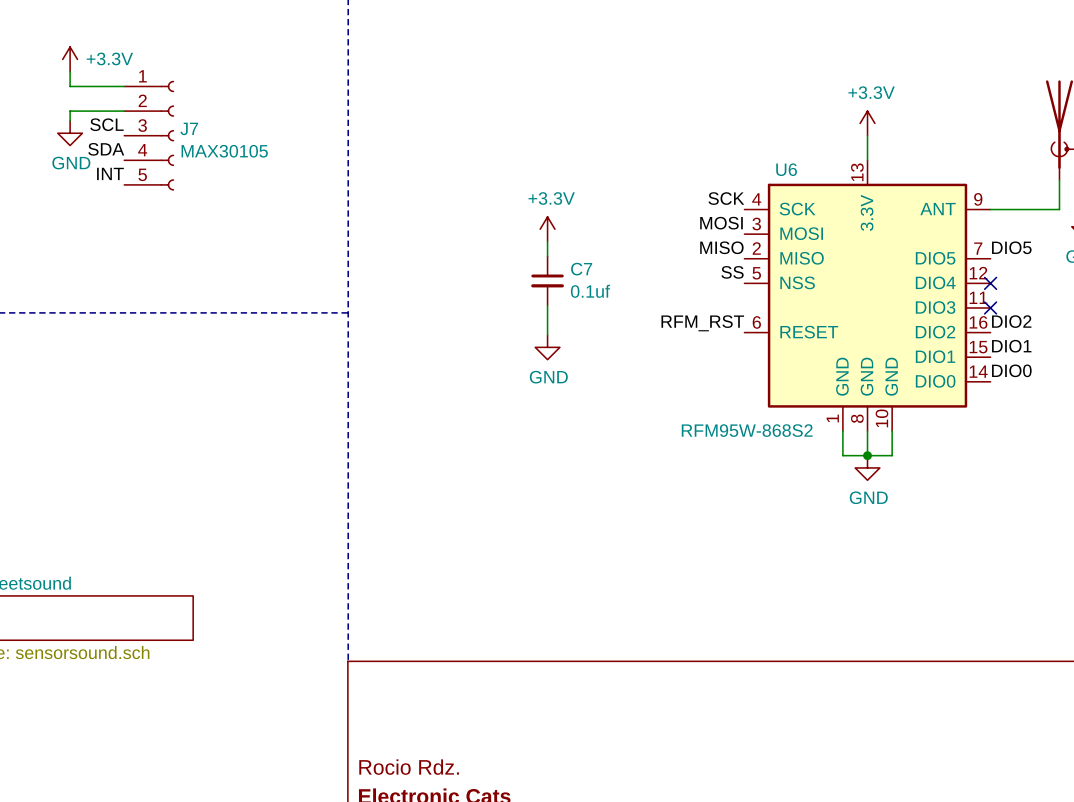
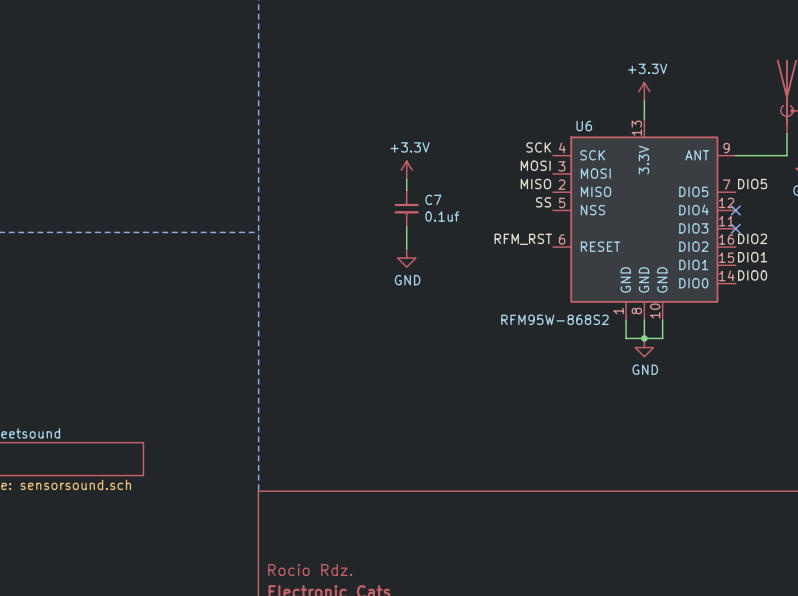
power symbol: +3.3V (70, 59) -> none
wire: (70, 71) (70, 86) (124, 86) -> none
wire: (124, 111) (70, 111) (70, 120) -> none
label: SCL (106, 124) -> none
power symbol: GND (70, 133) -> none
J7: MAX30105 (149, 135) -> none
label: SDA (106, 149) -> none
label: INT (110, 173) -> none

